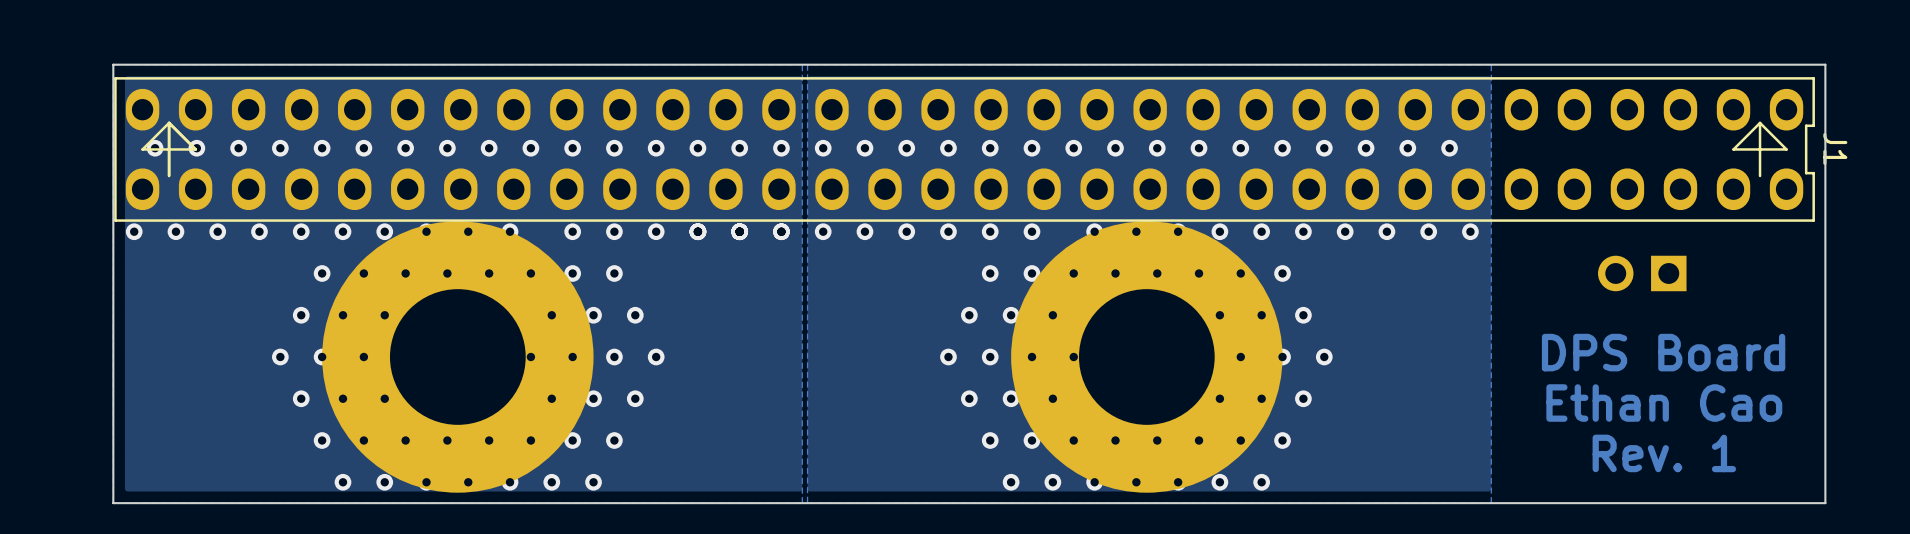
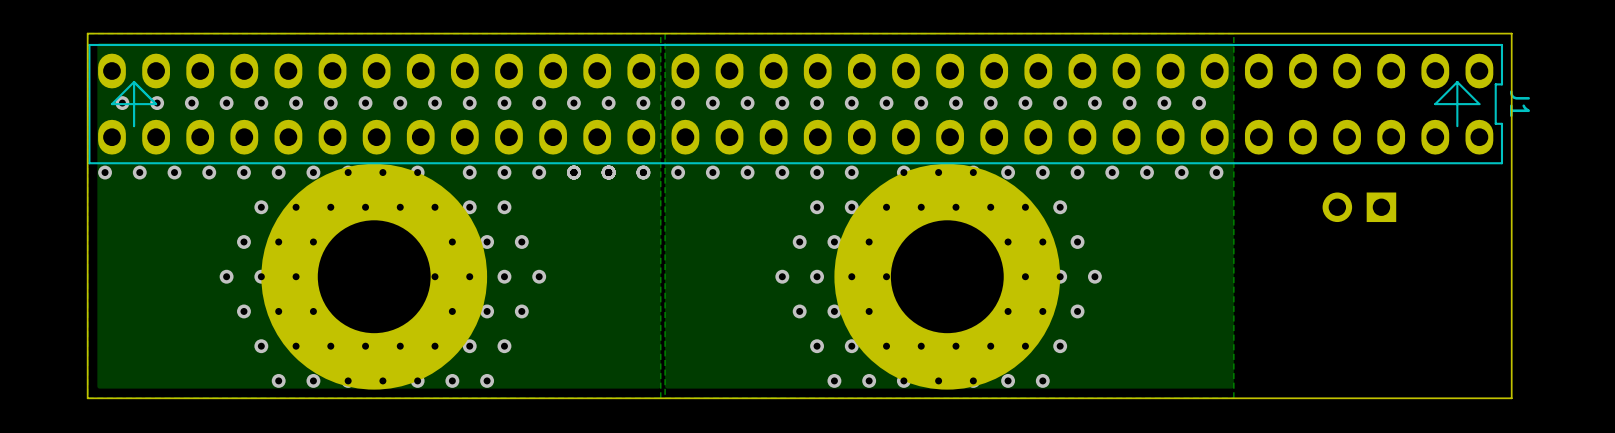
text: DPS Board (1663, 352) -> none
text: Ethan Cao (1664, 403) -> none
text: Rev. 1 (1664, 453) -> none

